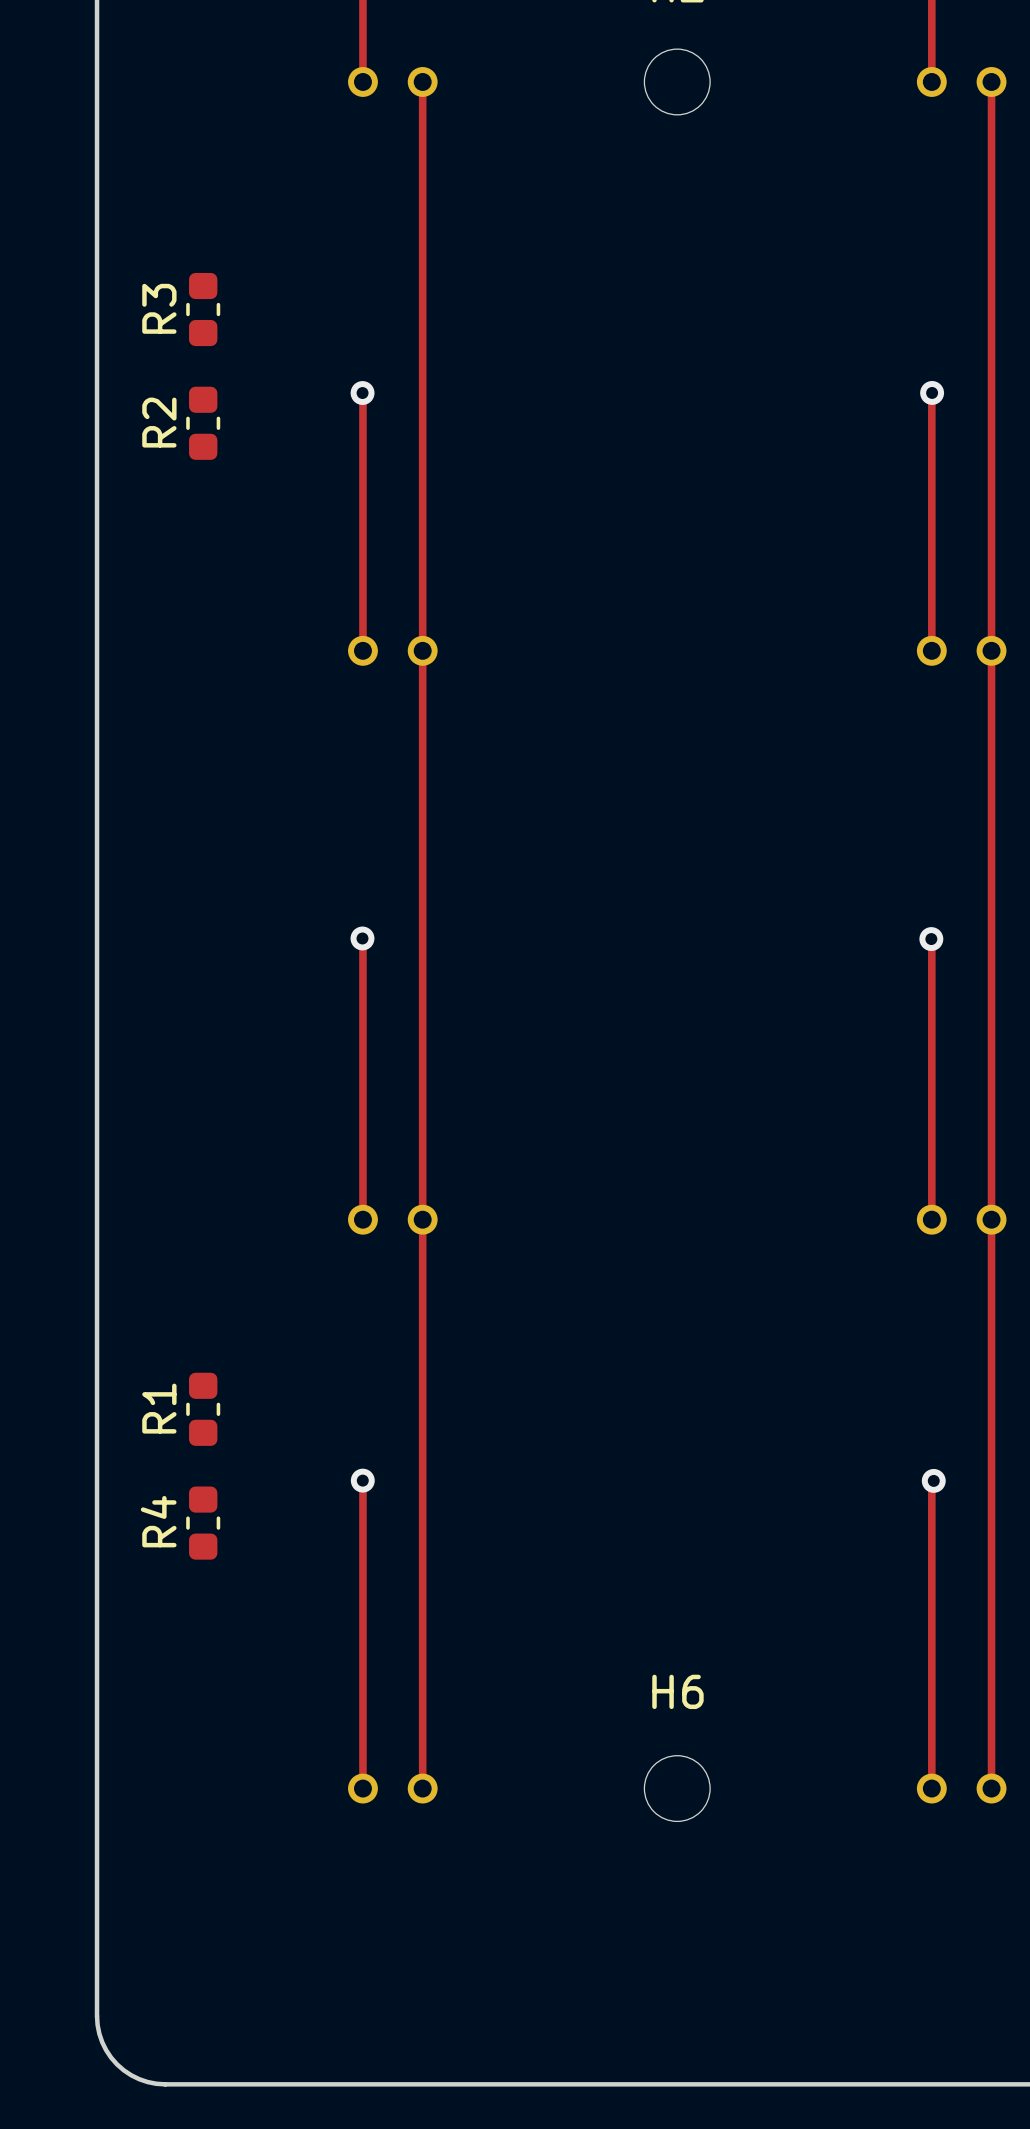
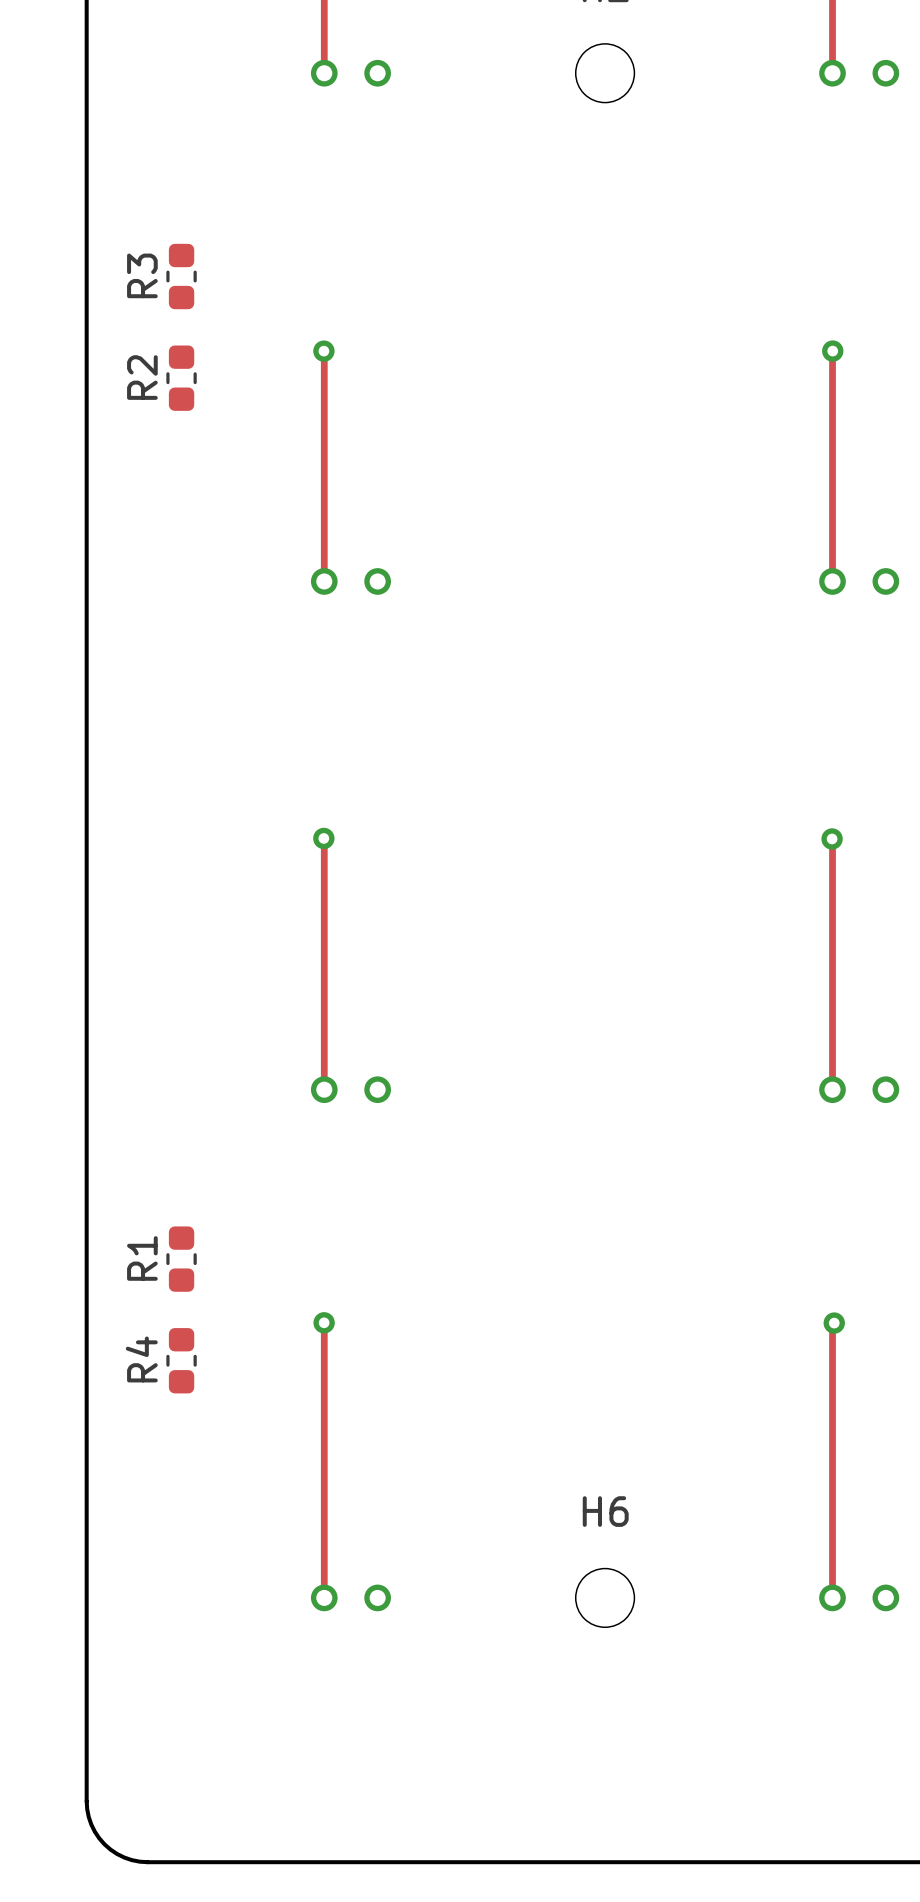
track: (422, 81) (422, 1788) -> none
track: (991, 81) (991, 1788) -> none

